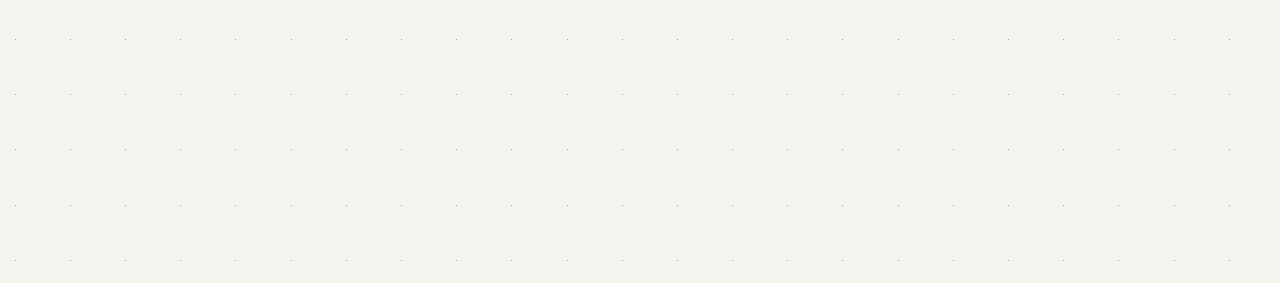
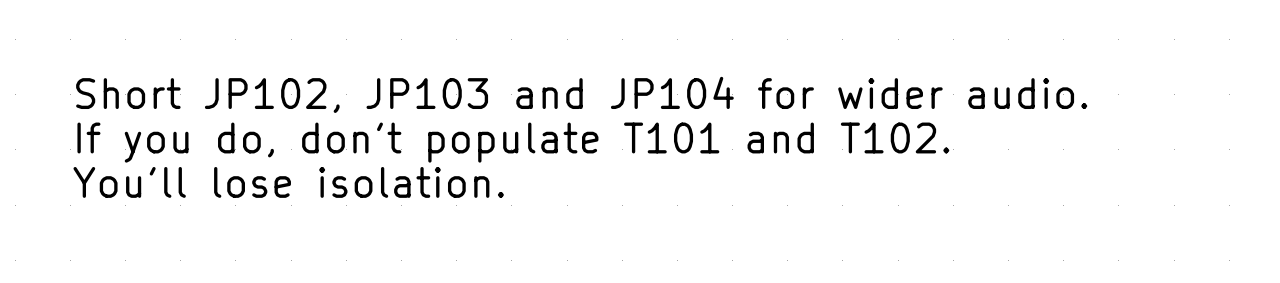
text: none -> Short JP102, JP103 and JP104 for wider audio. (581, 94)
text: none -> If you do, don't populate T101 and T102. (513, 142)
text: none -> You'll lose isolation. (288, 182)

